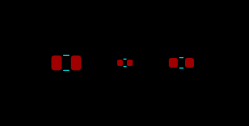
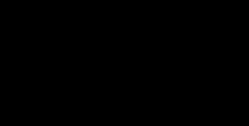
part: (66, 62) -> none
part: (124, 62) -> none
part: (181, 62) -> none

